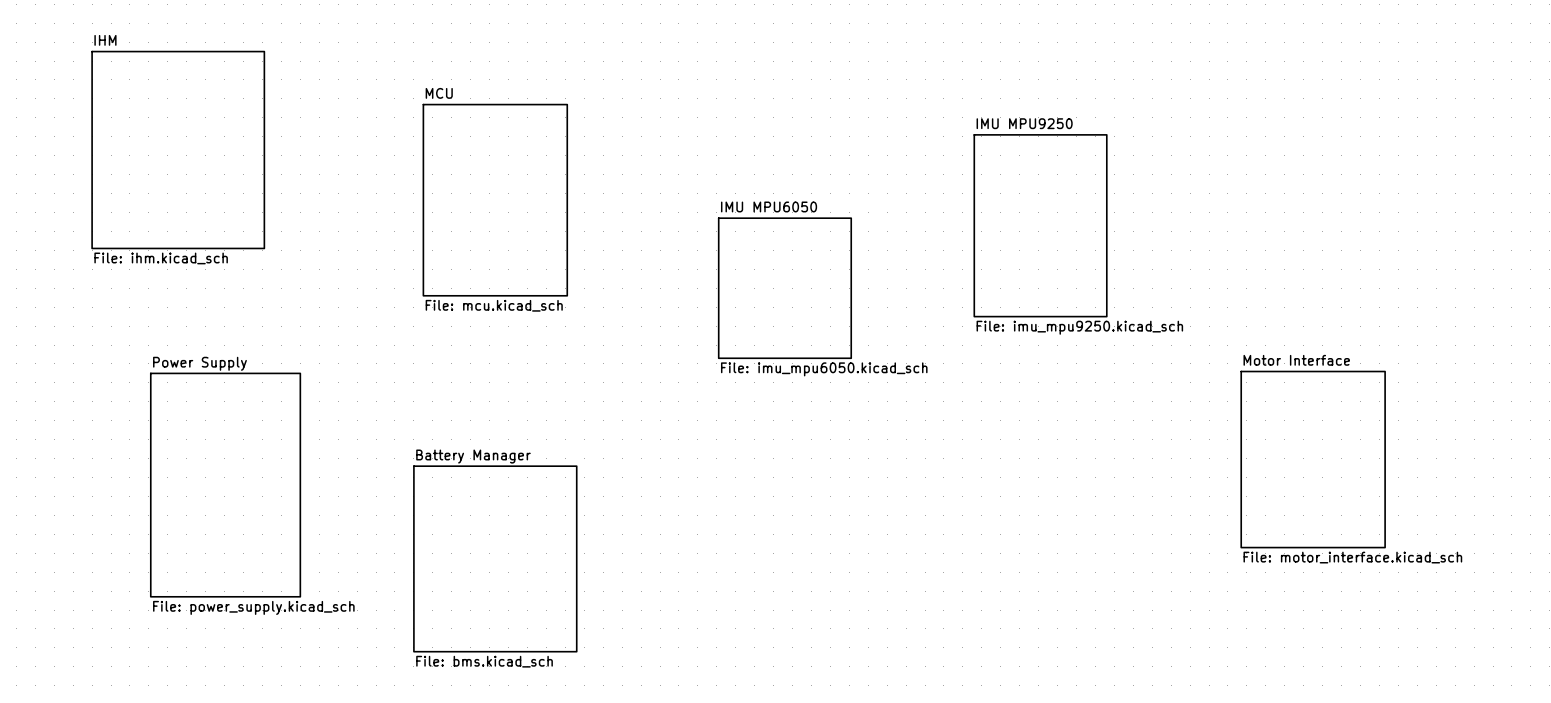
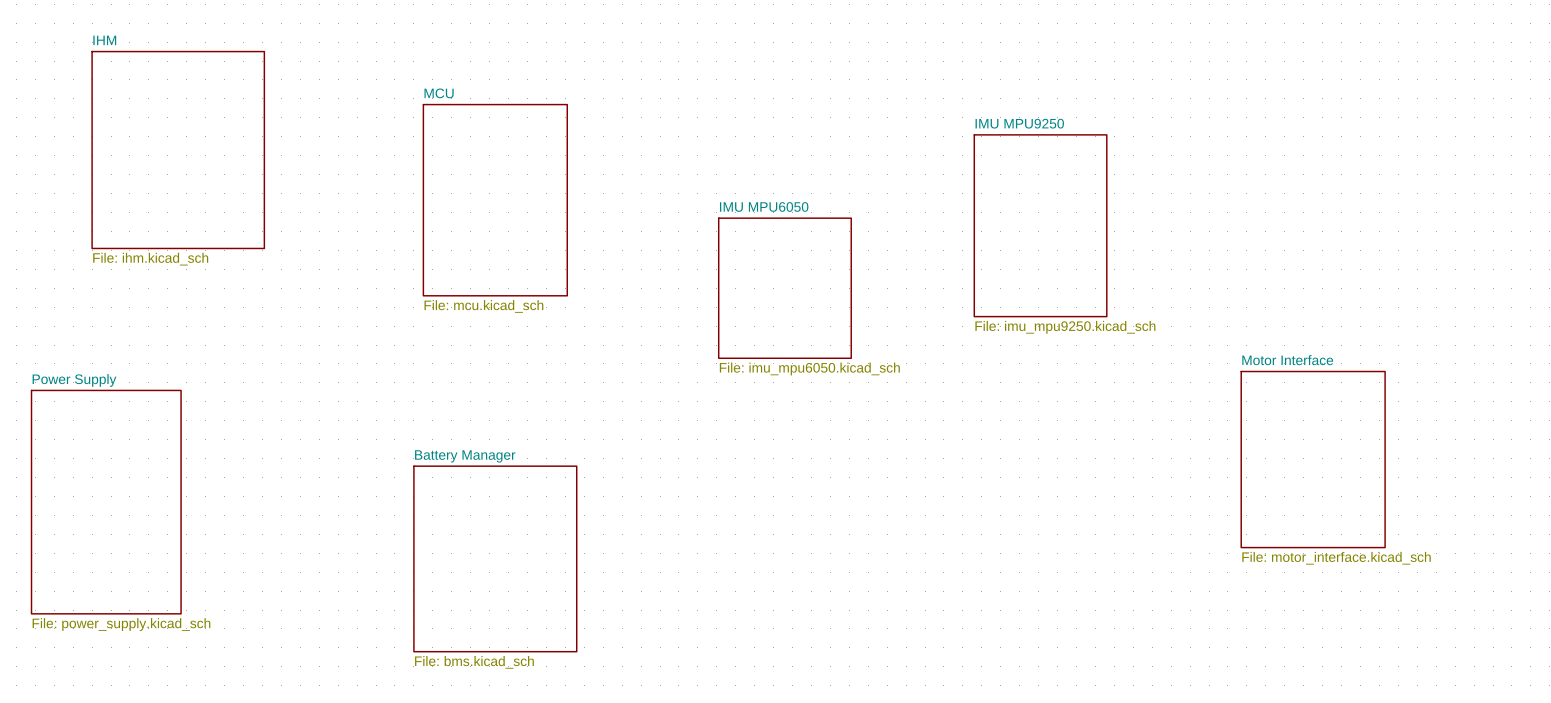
sheet Power Supply position: (225, 485) -> (106, 502)

